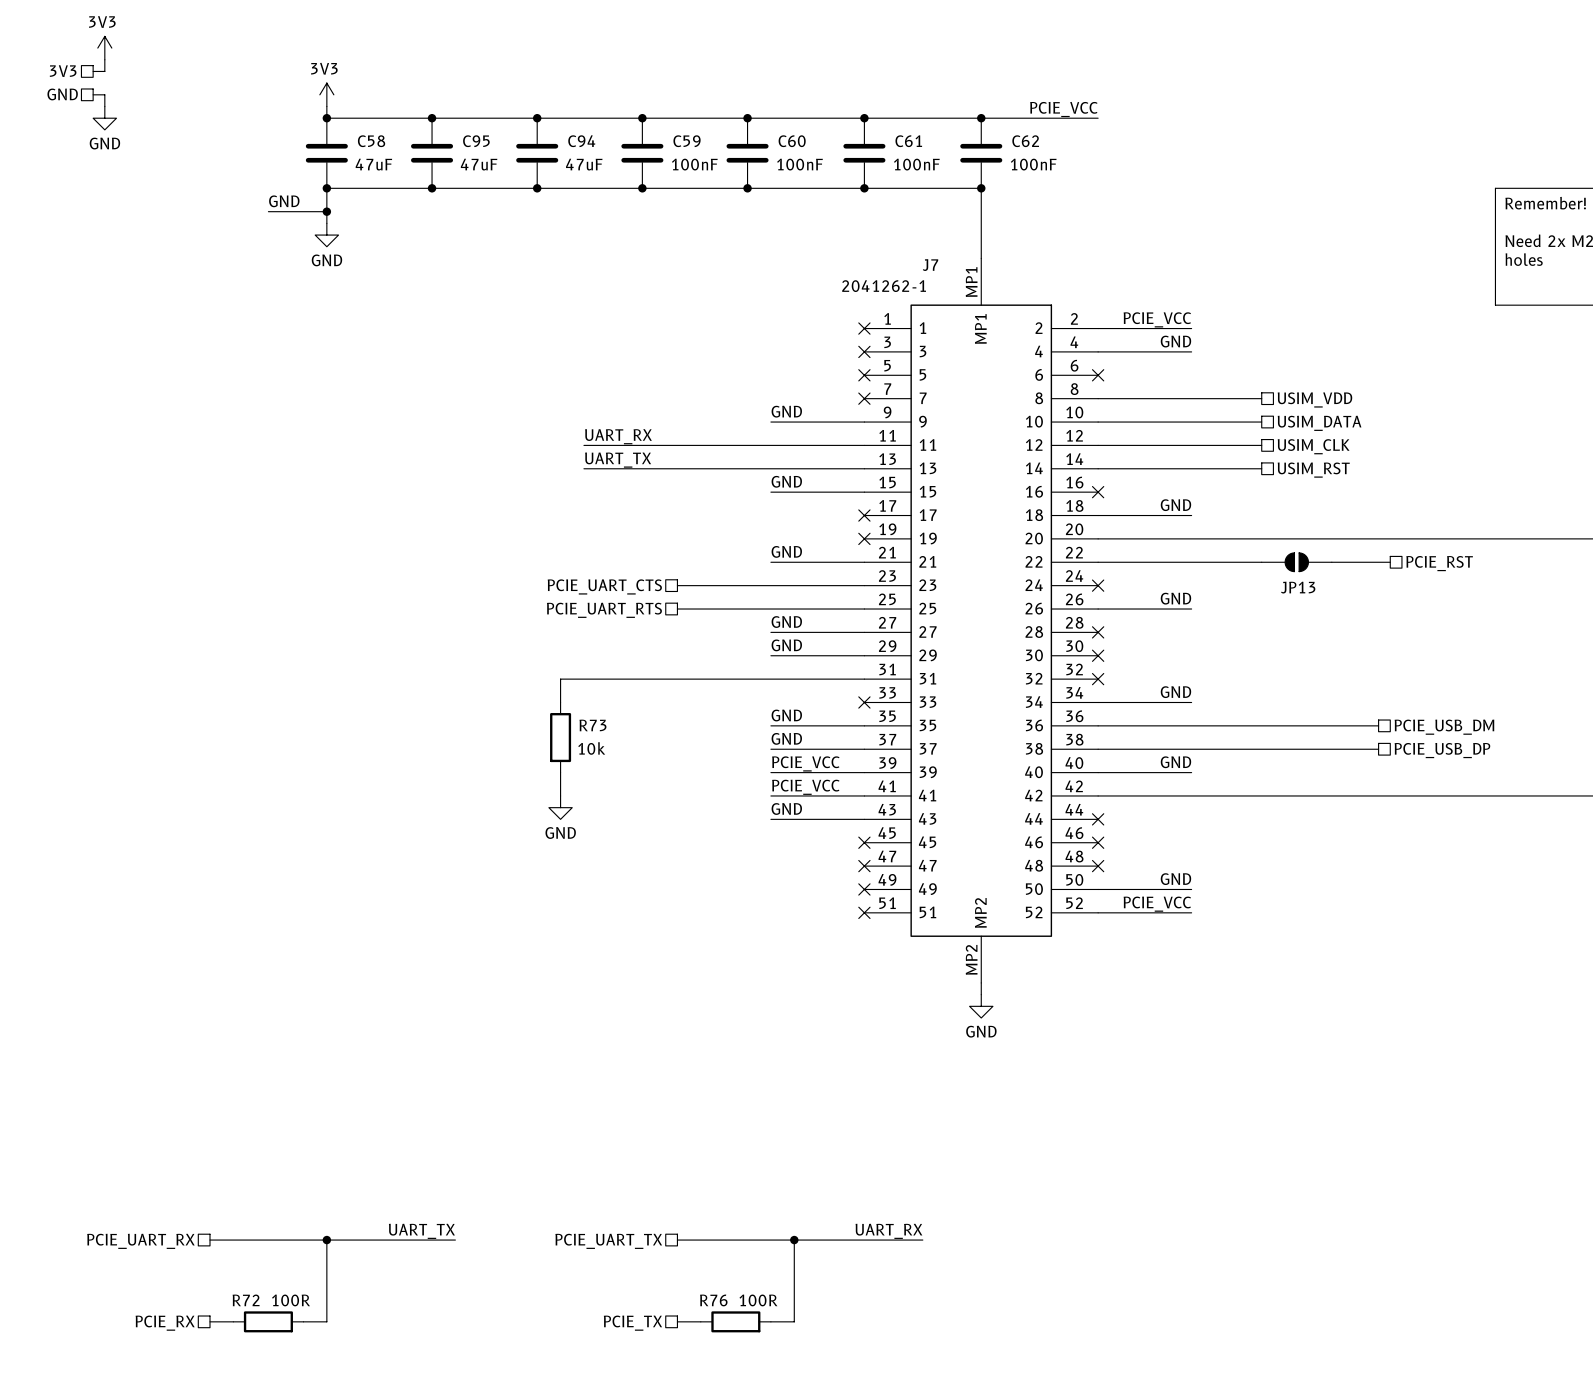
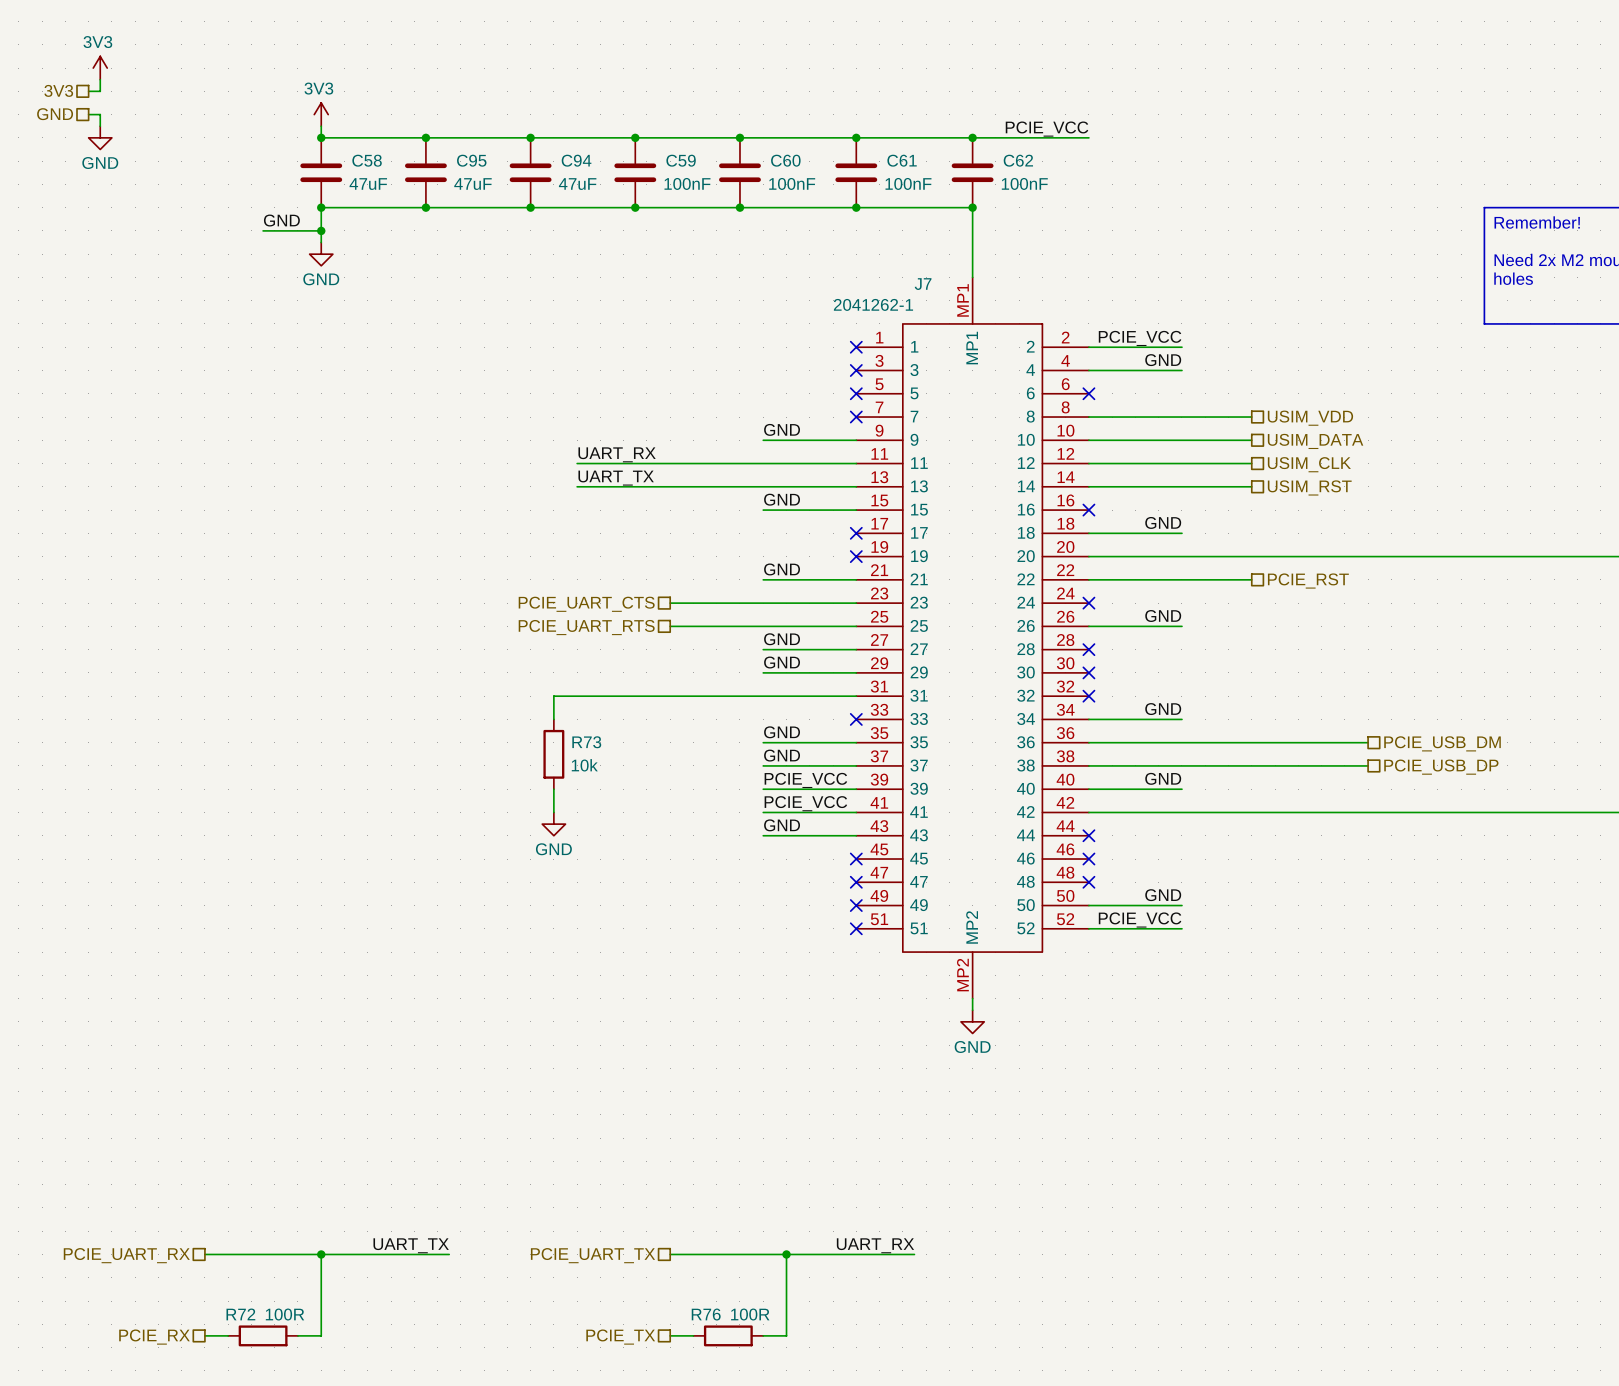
JP13: (1296, 562) -> none
wire: (1331, 562) (1390, 562) -> none
hierarchical label position: PCIE_RST (1439, 563) -> PCIE_RST (1308, 581)

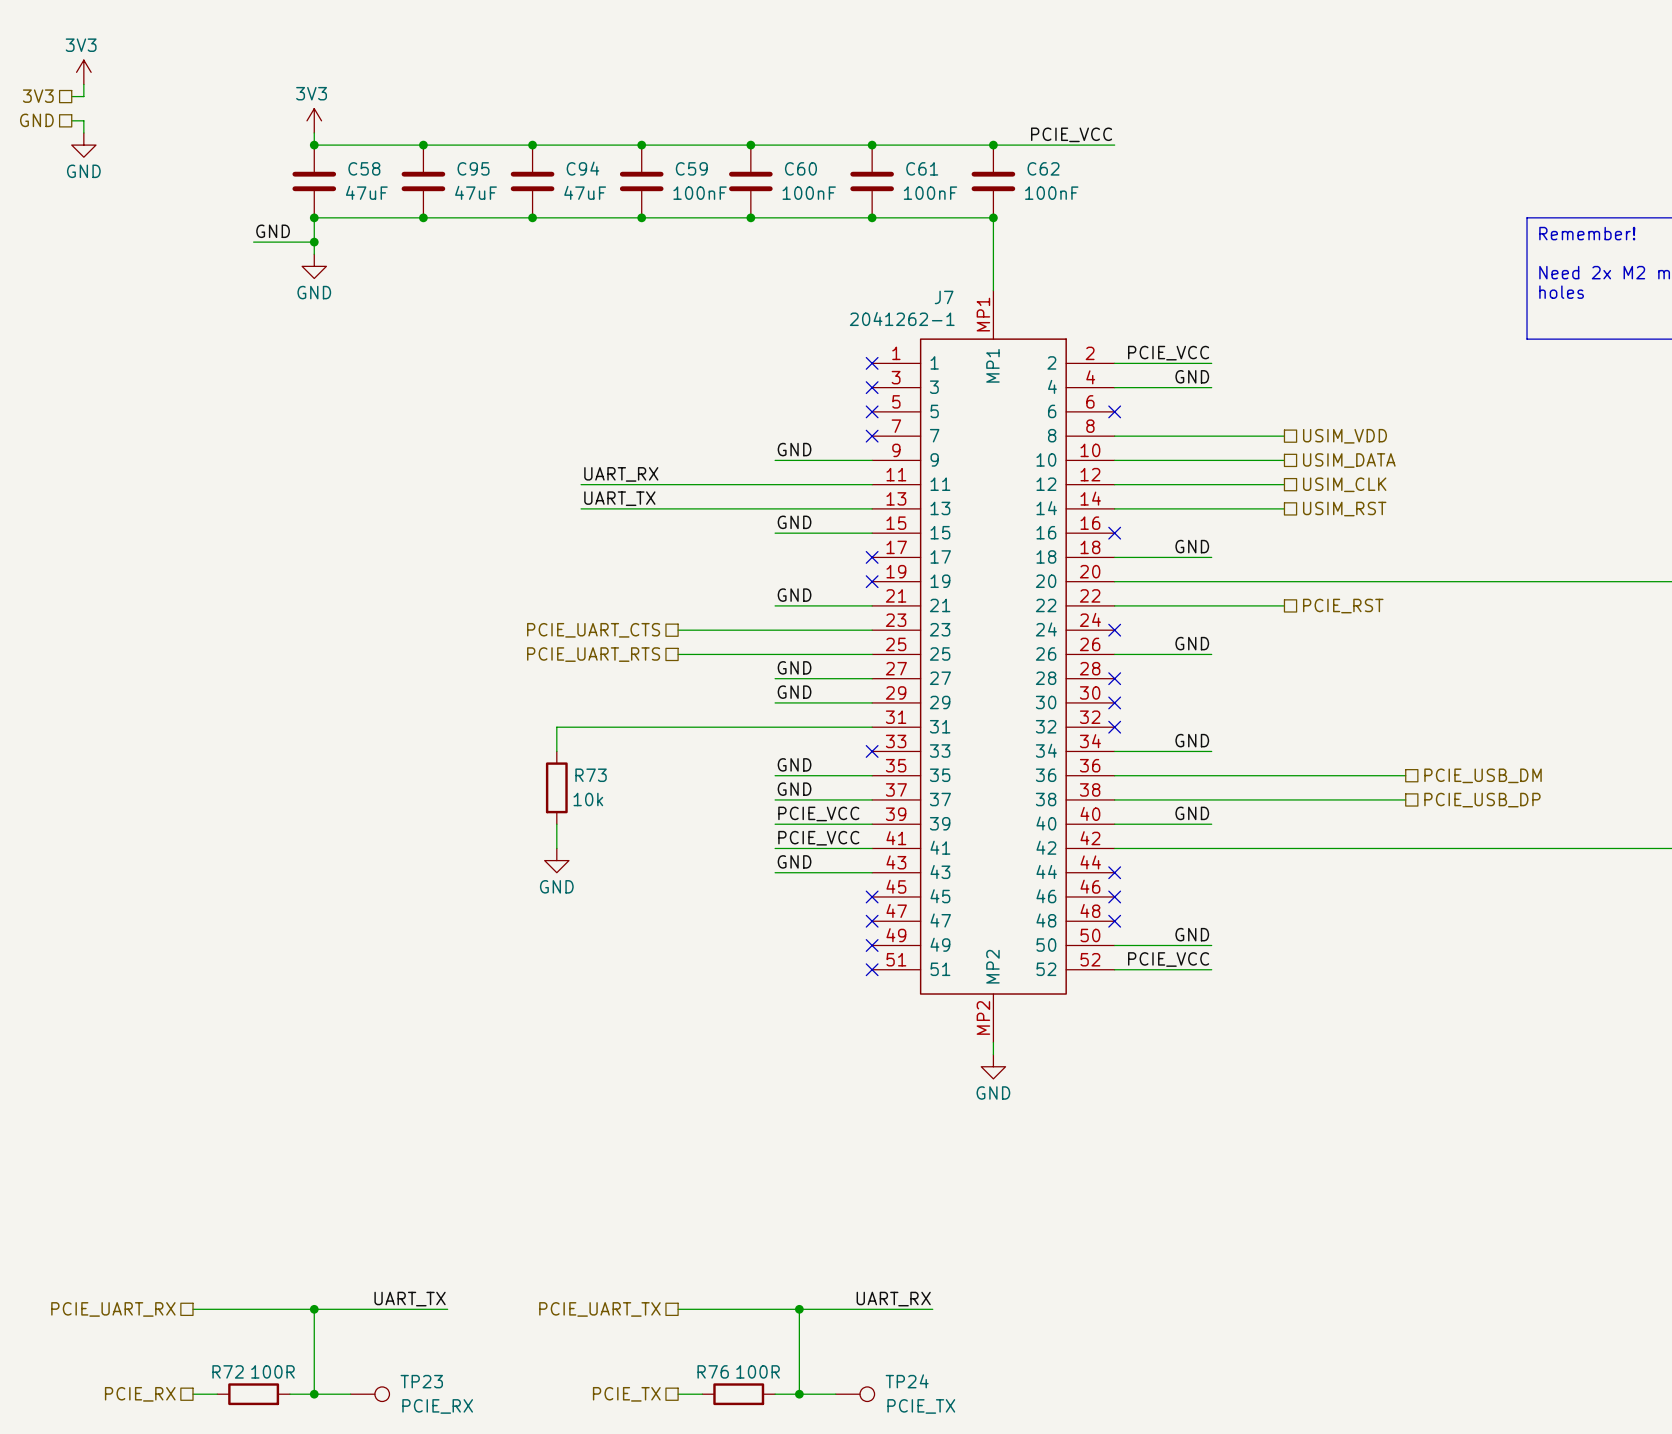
wire: none -> (314, 1394) (350, 1394)
junction: none -> (314, 1394)
TP23: none -> PCIE_RX (370, 1394)
wire: none -> (799, 1394) (835, 1394)
junction: none -> (799, 1394)
TP24: none -> PCIE_TX (855, 1394)

